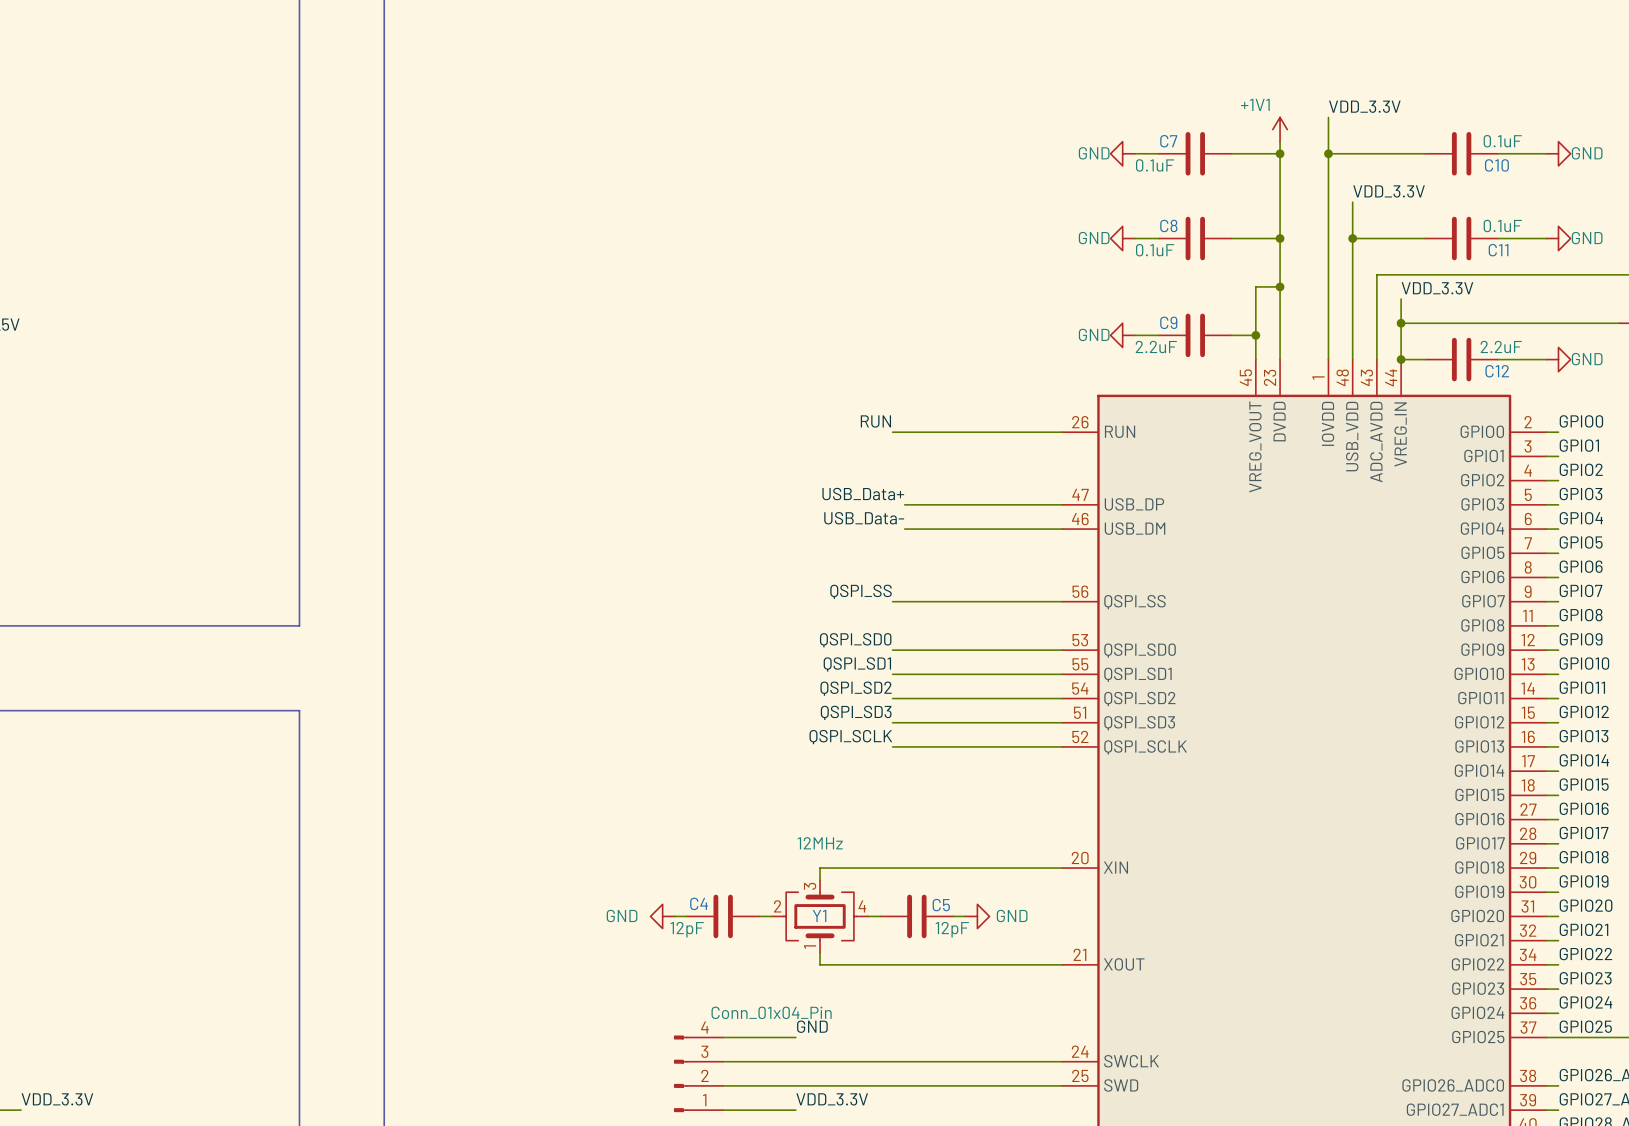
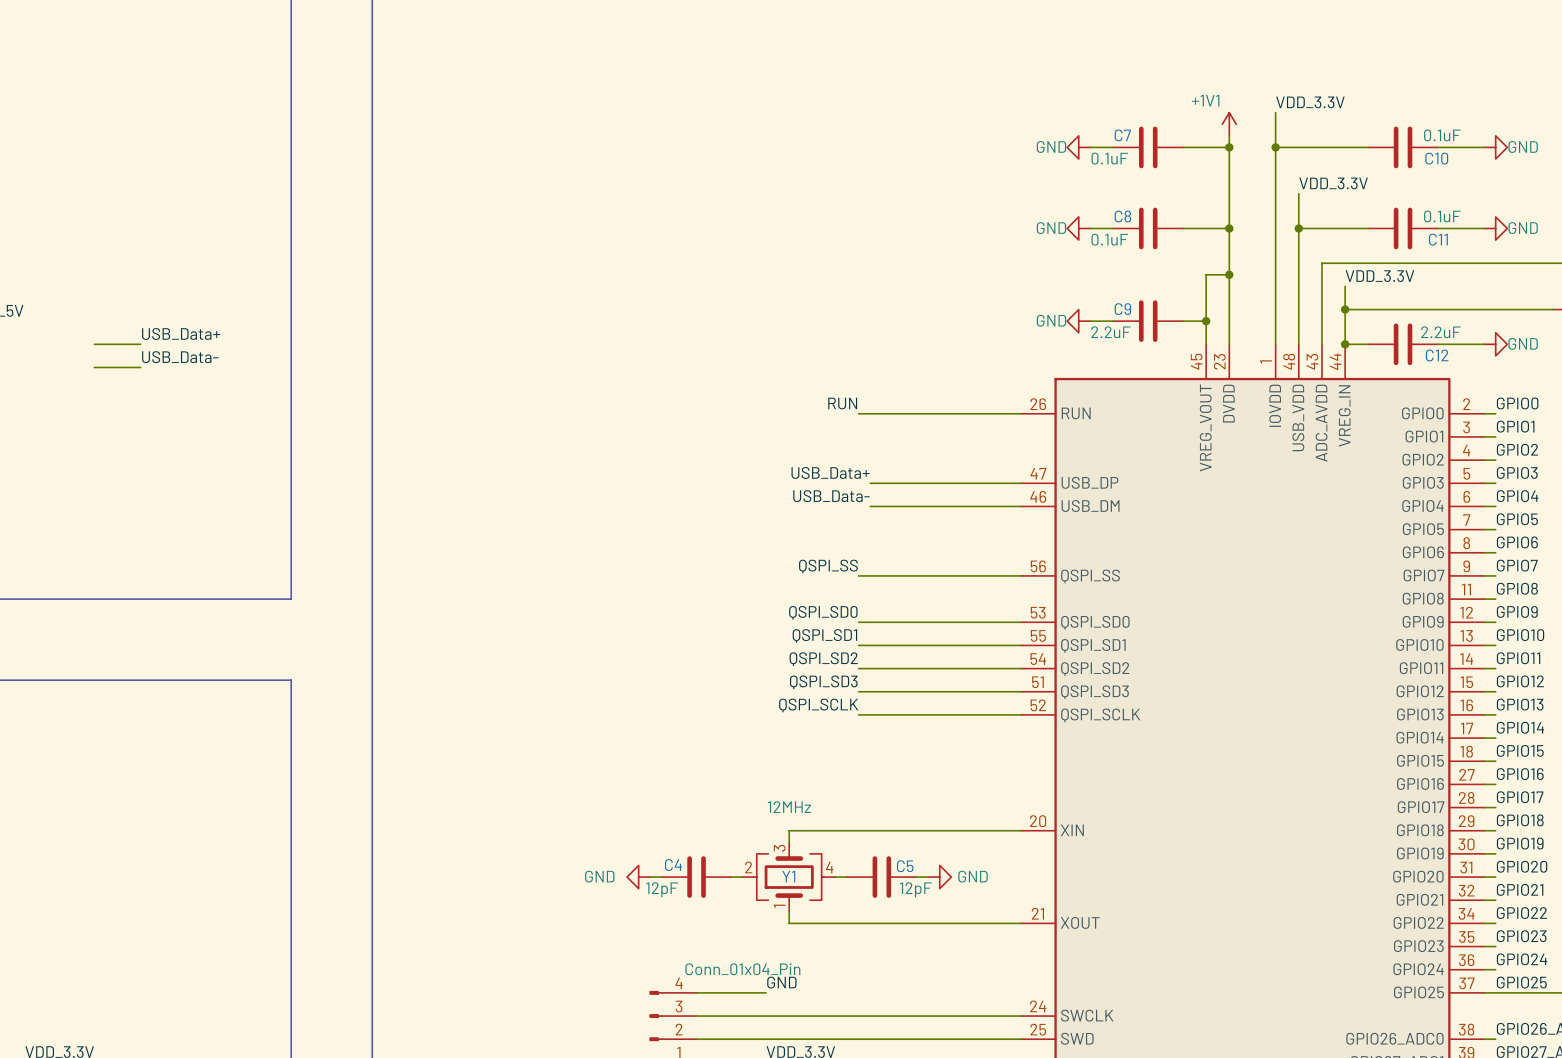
label: none -> USB_Data+ (181, 333)
wire: none -> (94, 344) (140, 344)
label: none -> USB_Data- (180, 357)
wire: none -> (94, 367) (140, 367)

